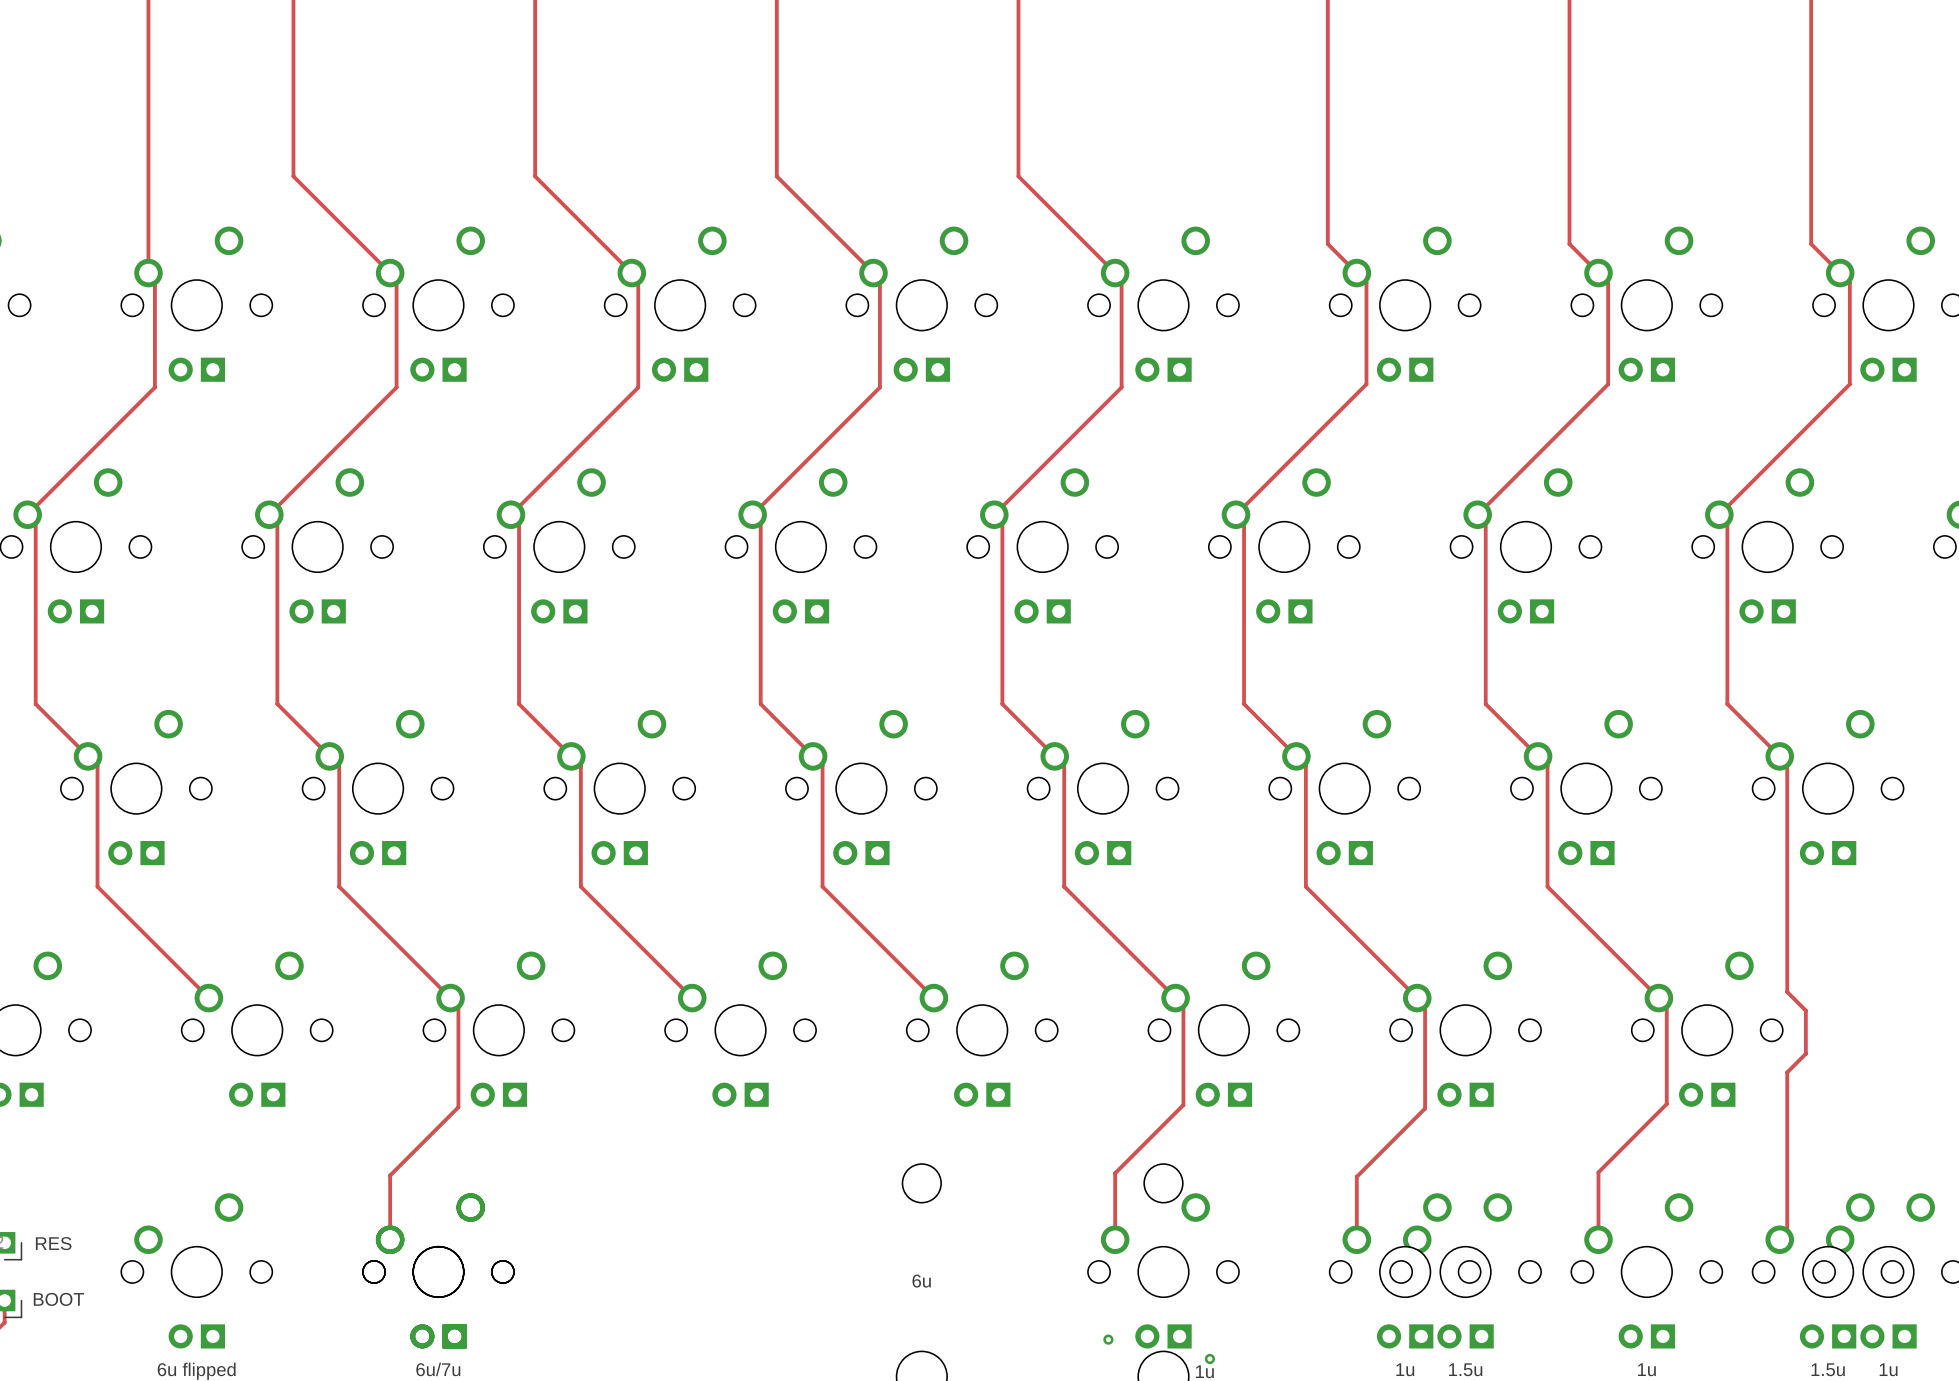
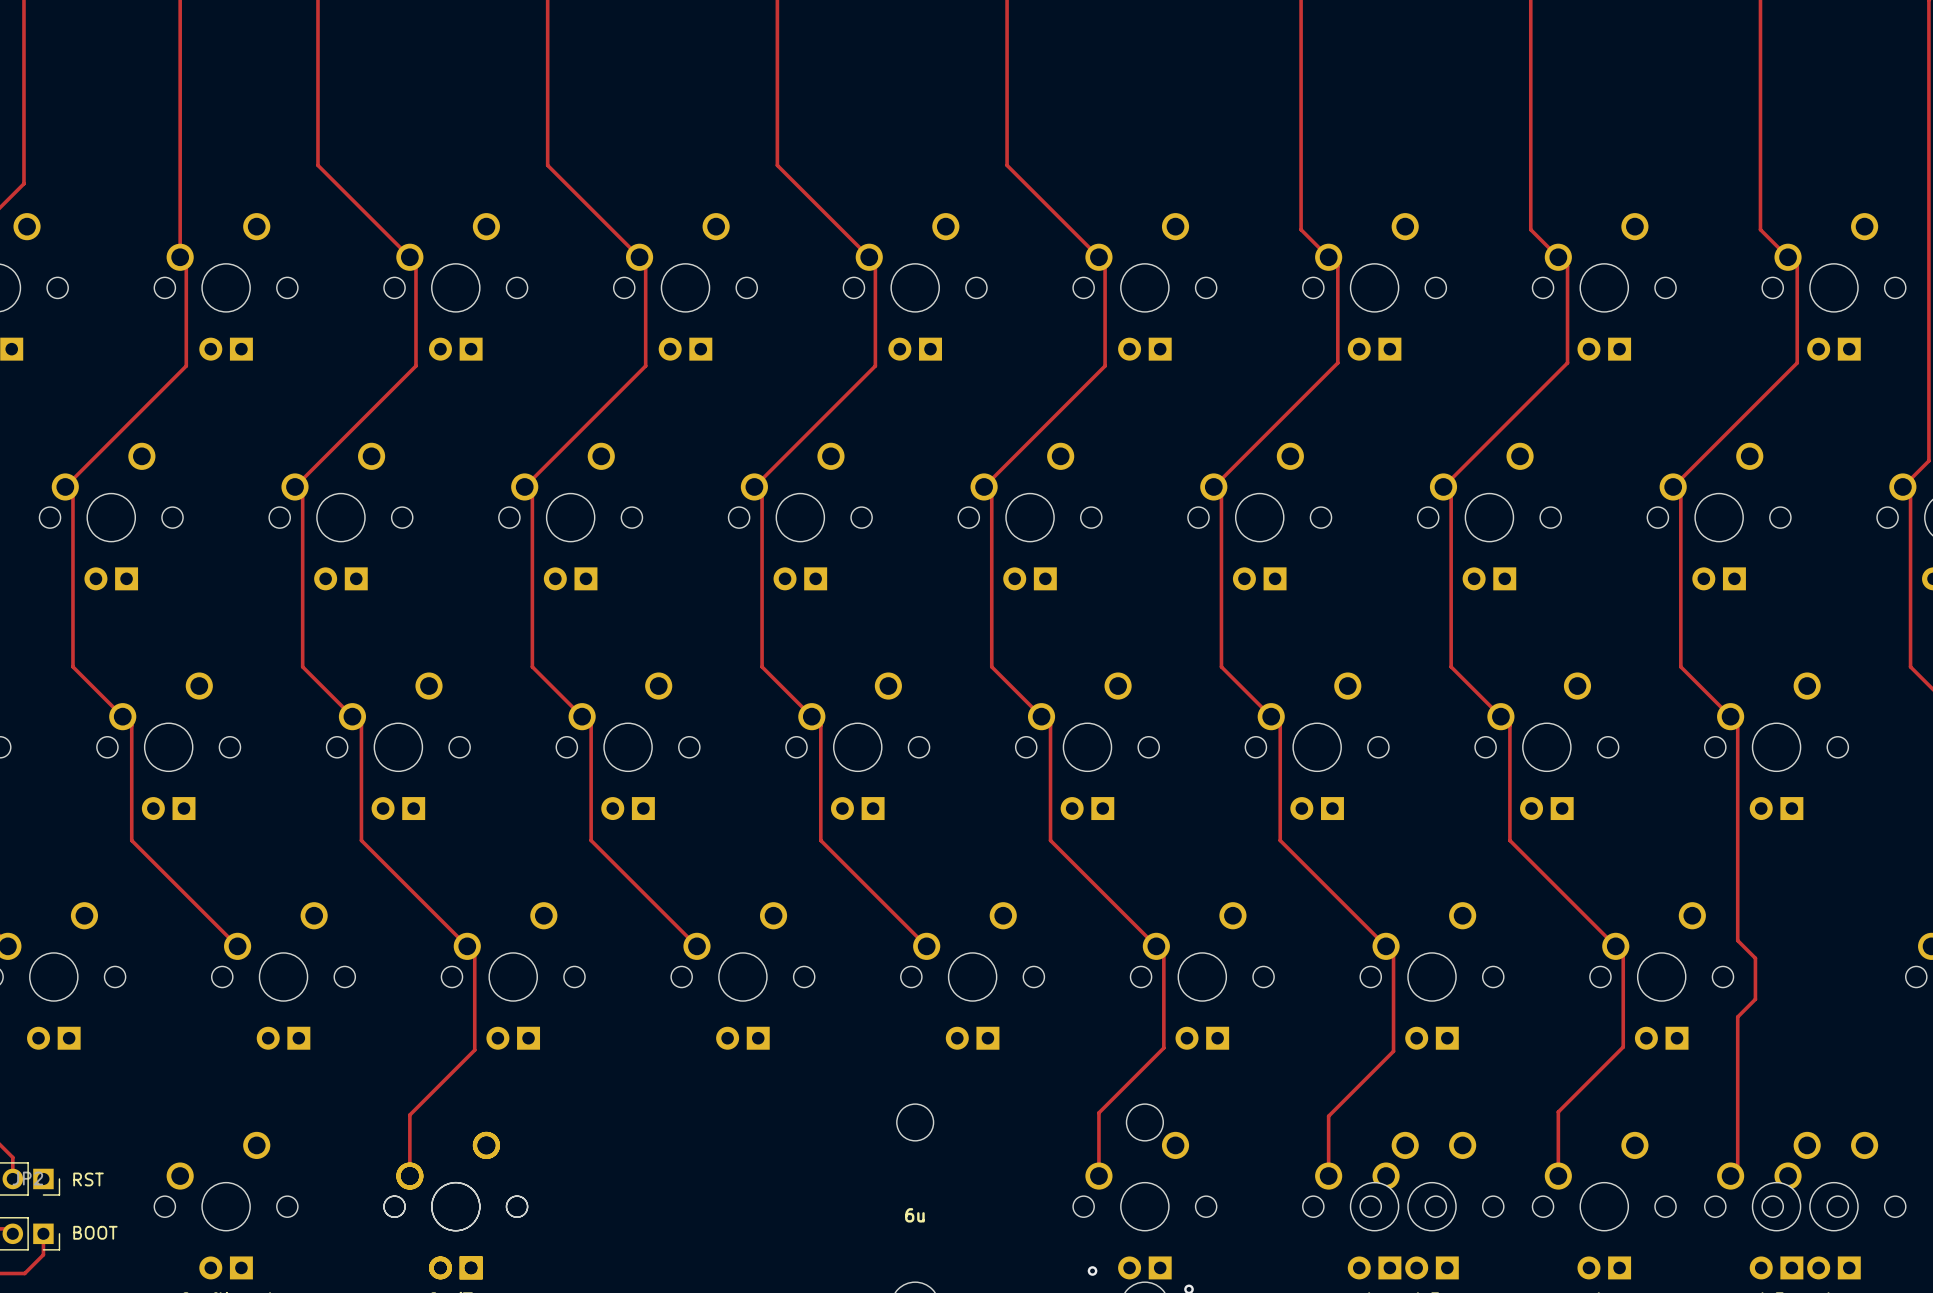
text: RES (53, 1243) -> RST (88, 1179)

